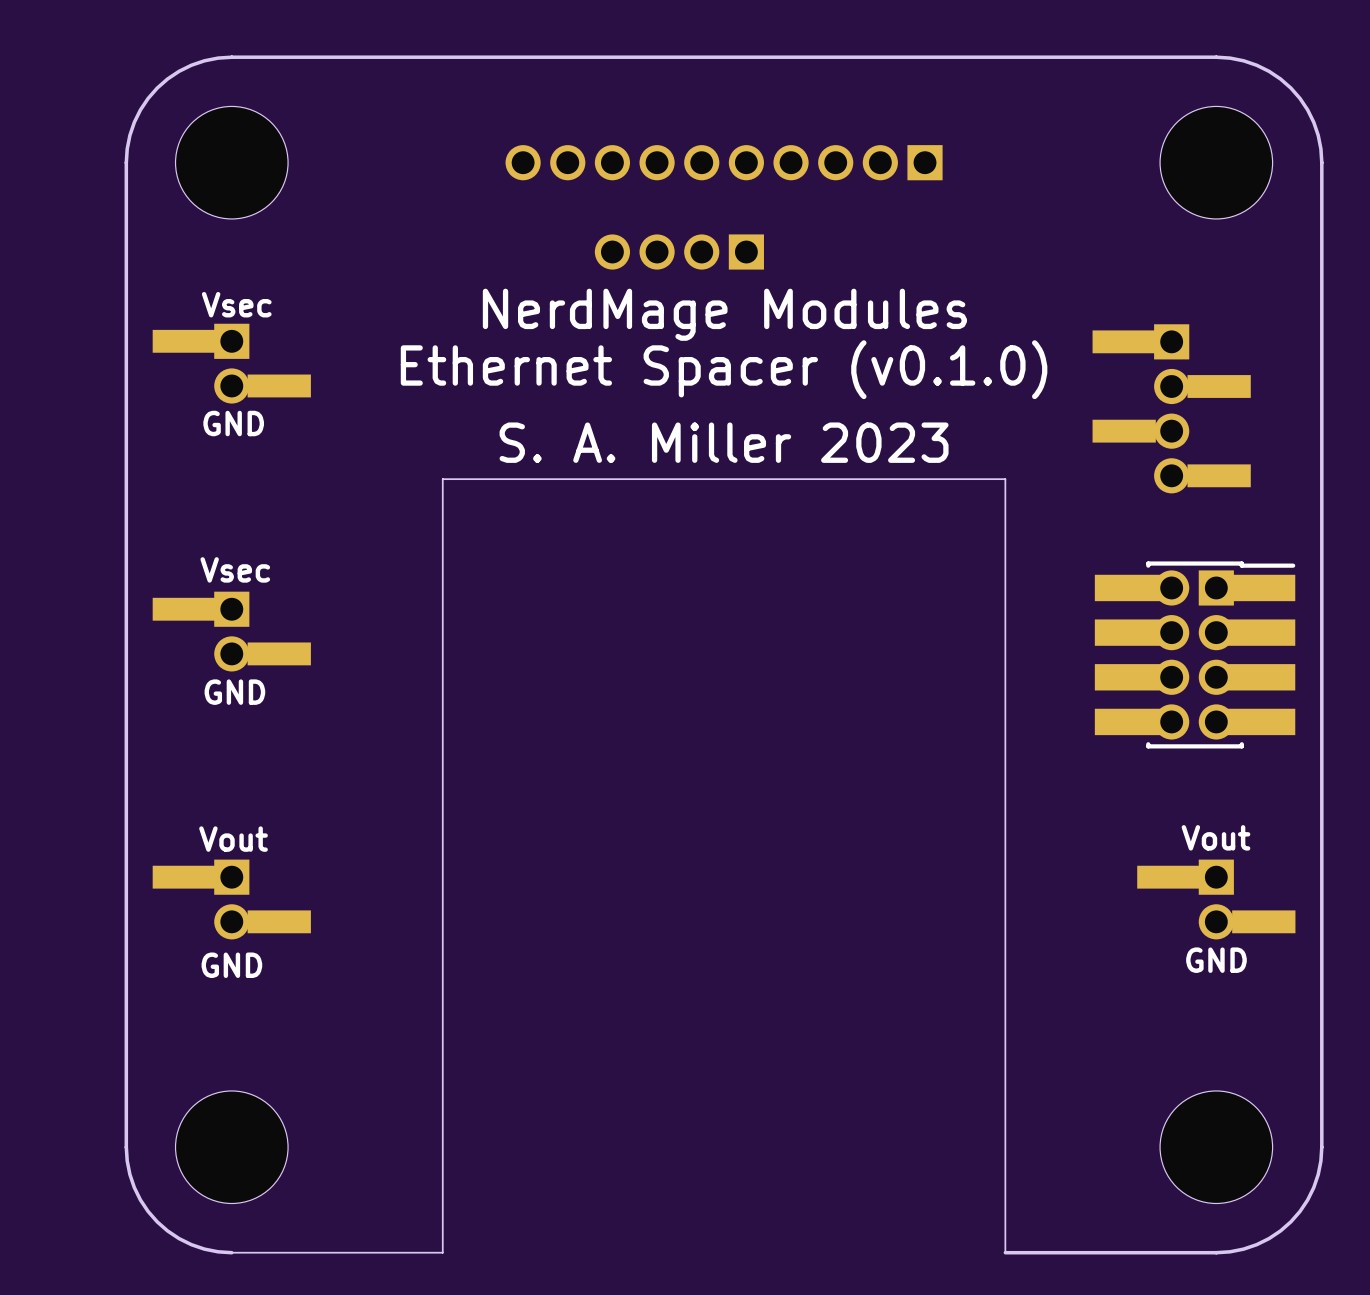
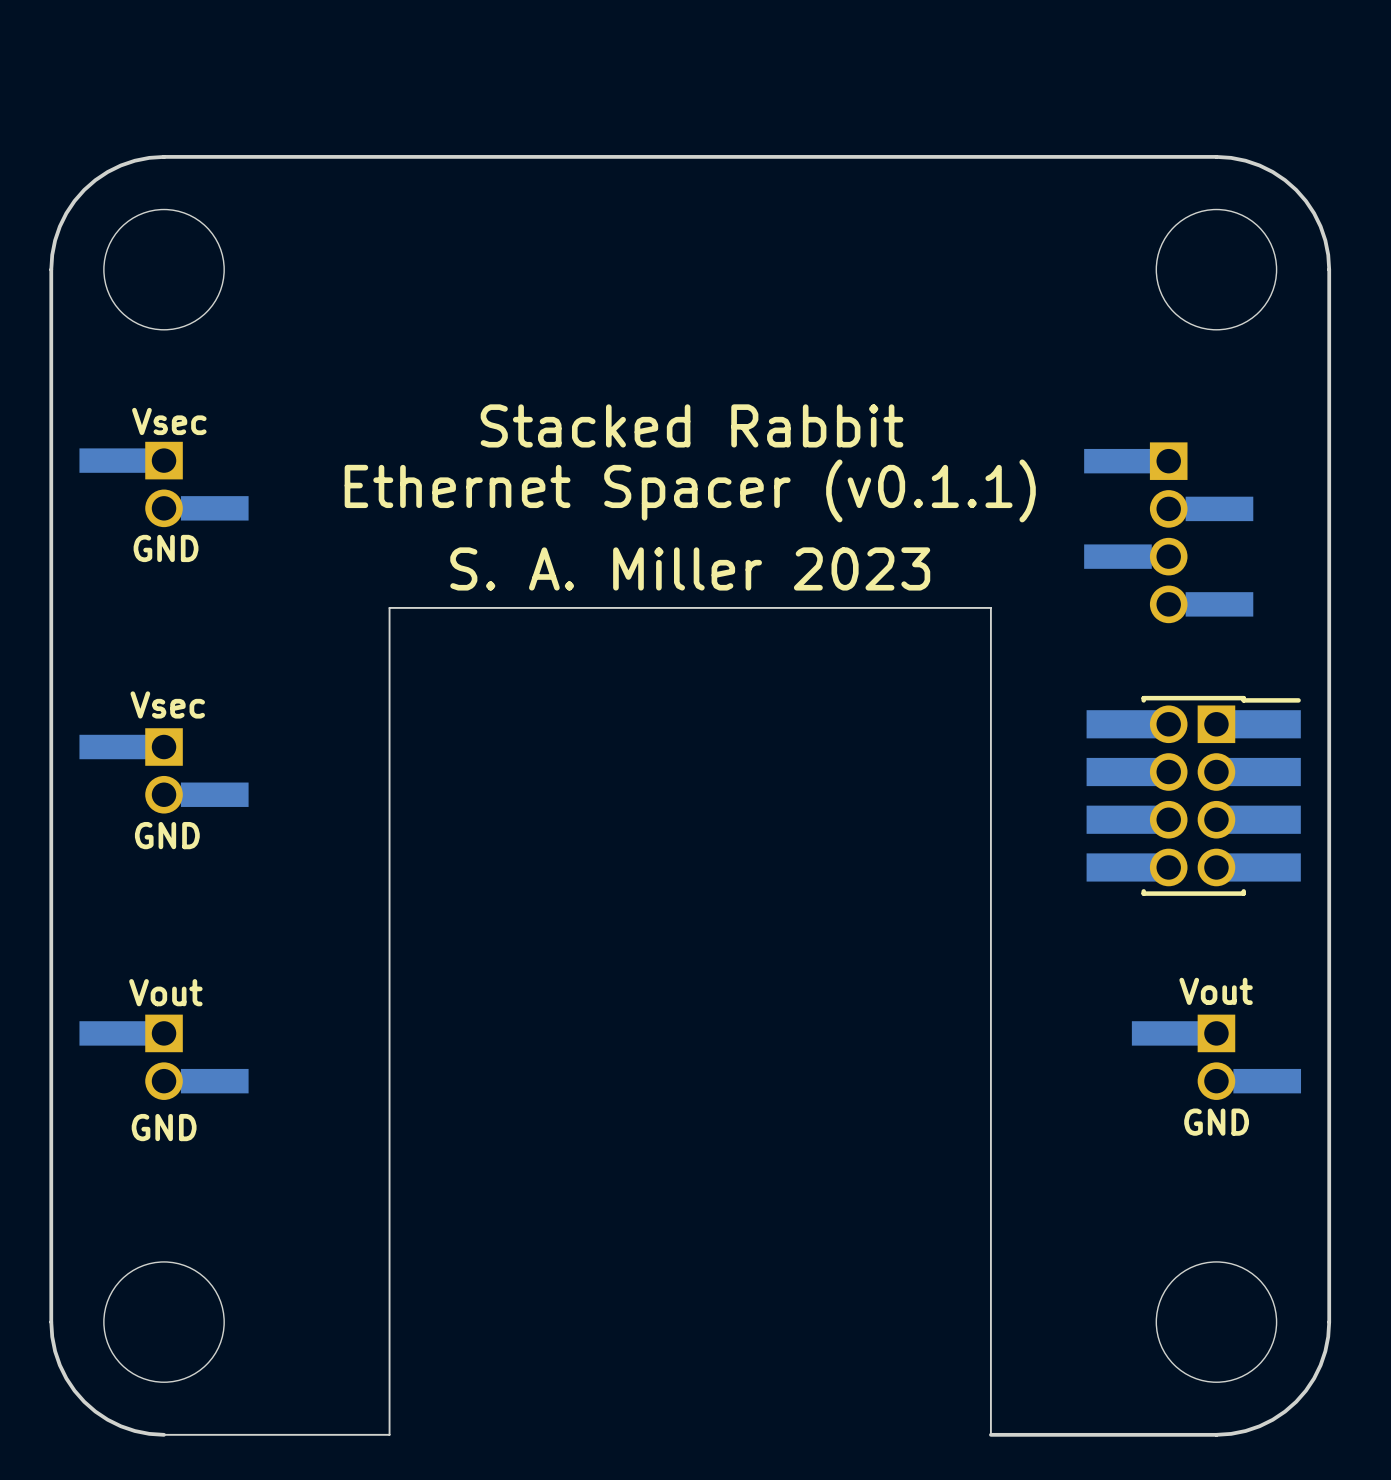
part: (724, 162) -> none
part: (679, 252) -> none
text: NerdMage Modules (724, 314) -> Stacked Rabbit (692, 425)
text: Ethernet Spacer (v0.1.0) (724, 369) -> Ethernet Spacer (v0.1.1) (690, 490)

